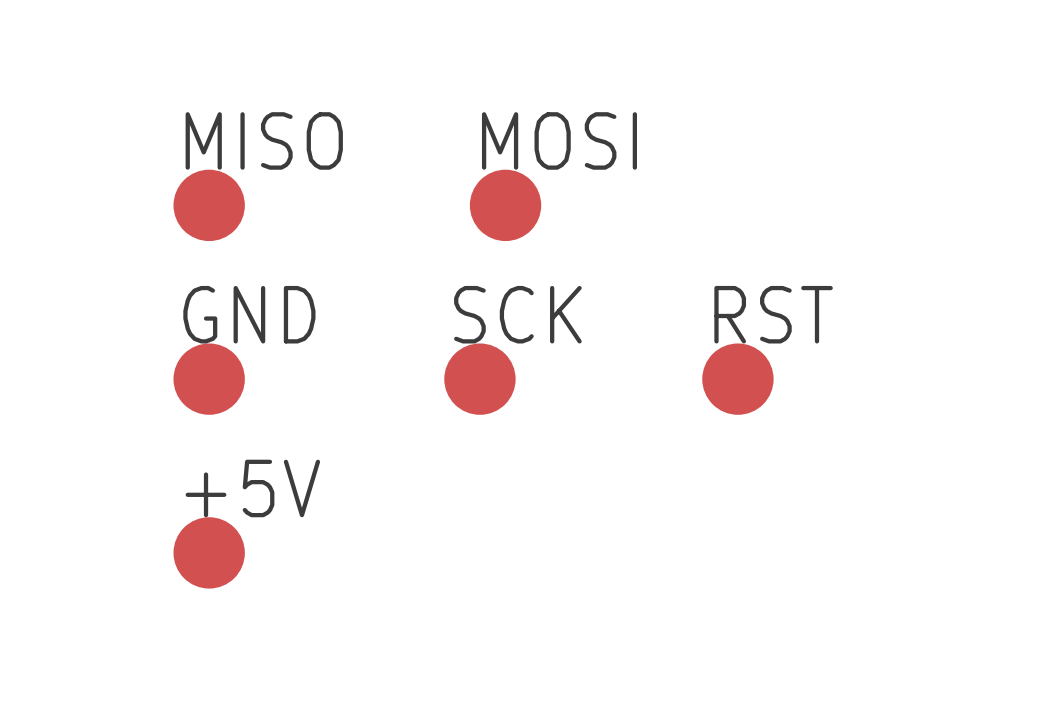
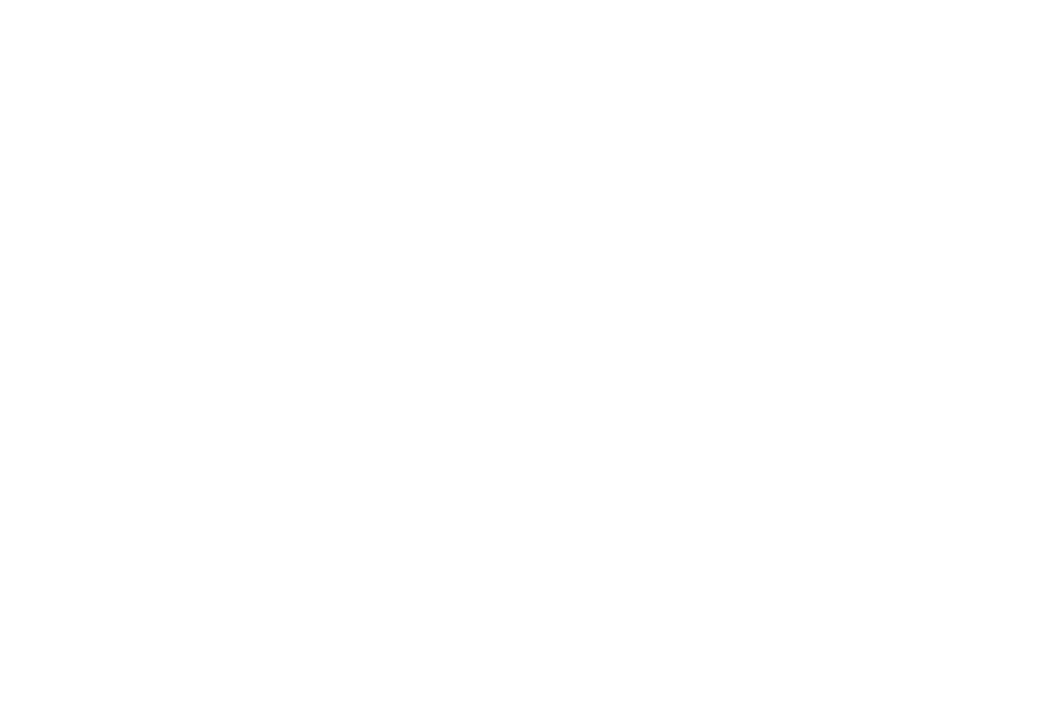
MISO: (209, 205) -> none
MOSI: (505, 205) -> none
GND: (209, 379) -> none
SCK: (479, 379) -> none
RST: (737, 379) -> none
+5V: (209, 552) -> none

